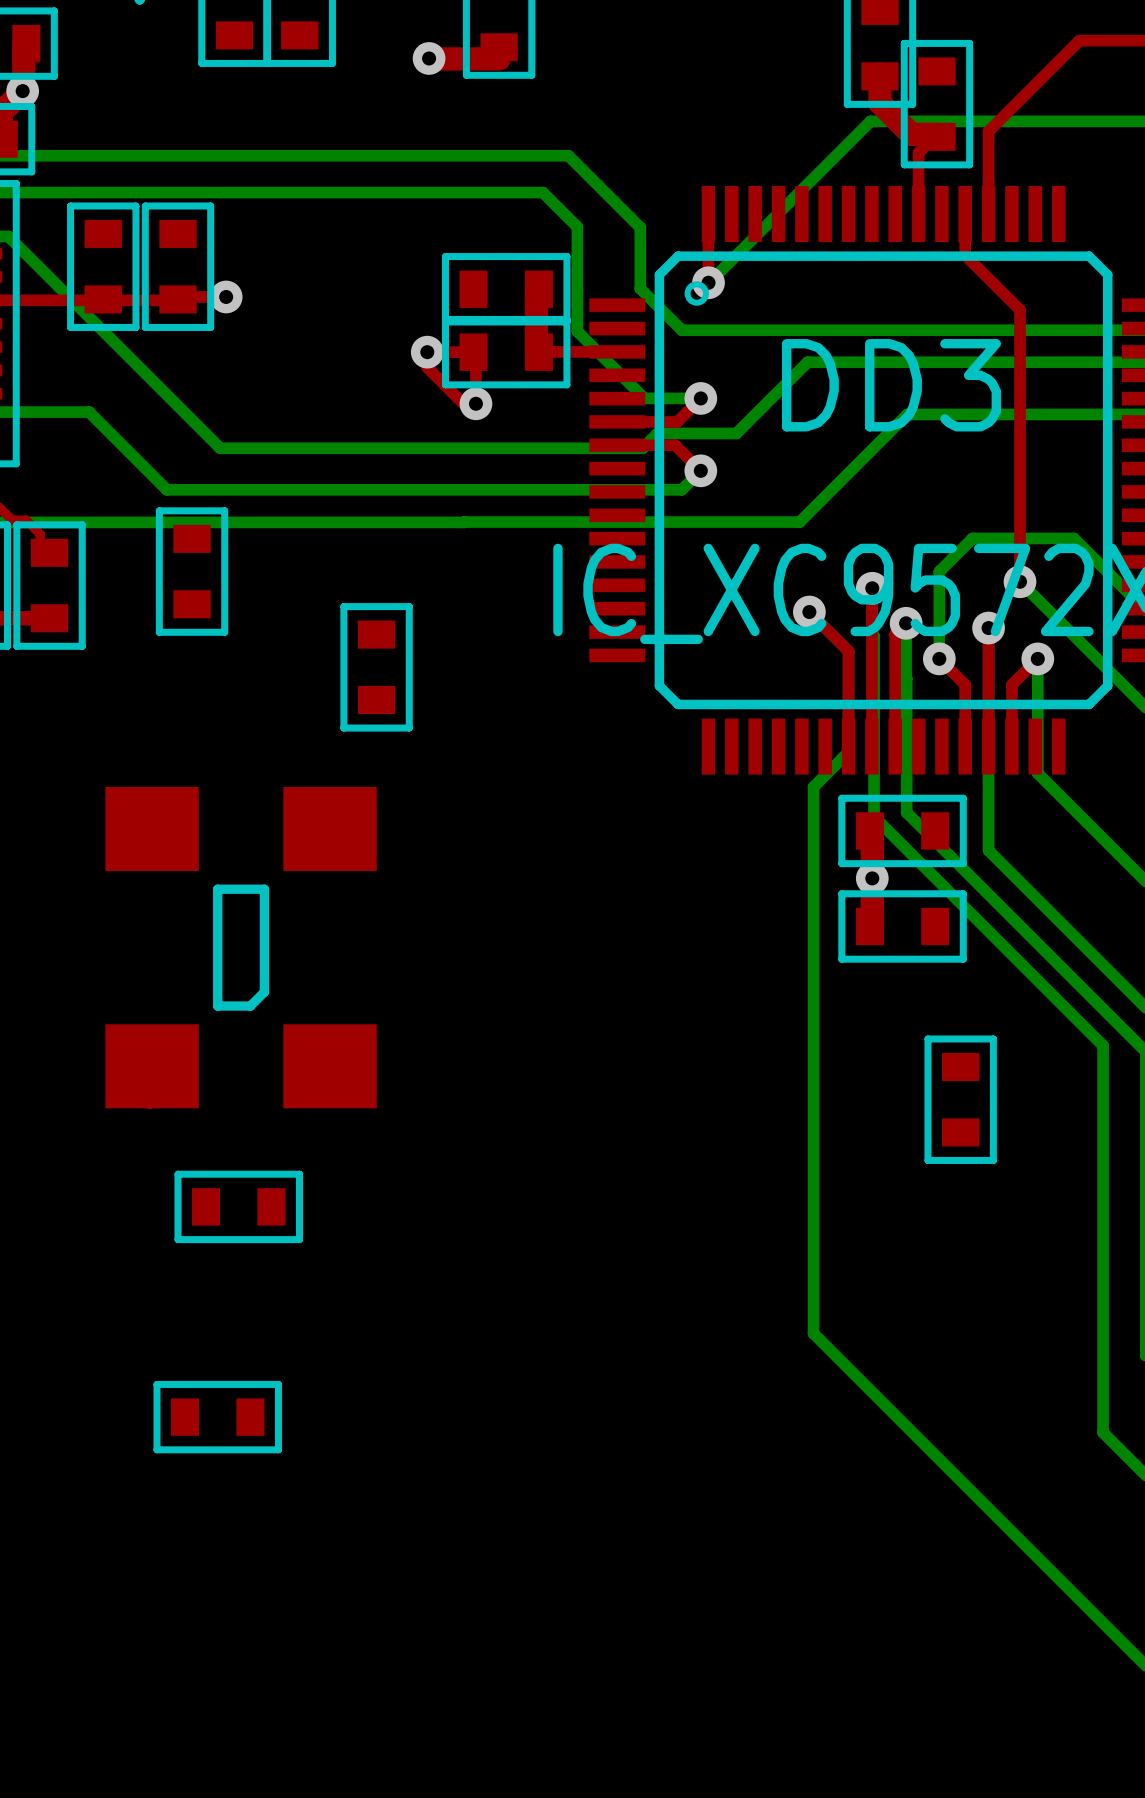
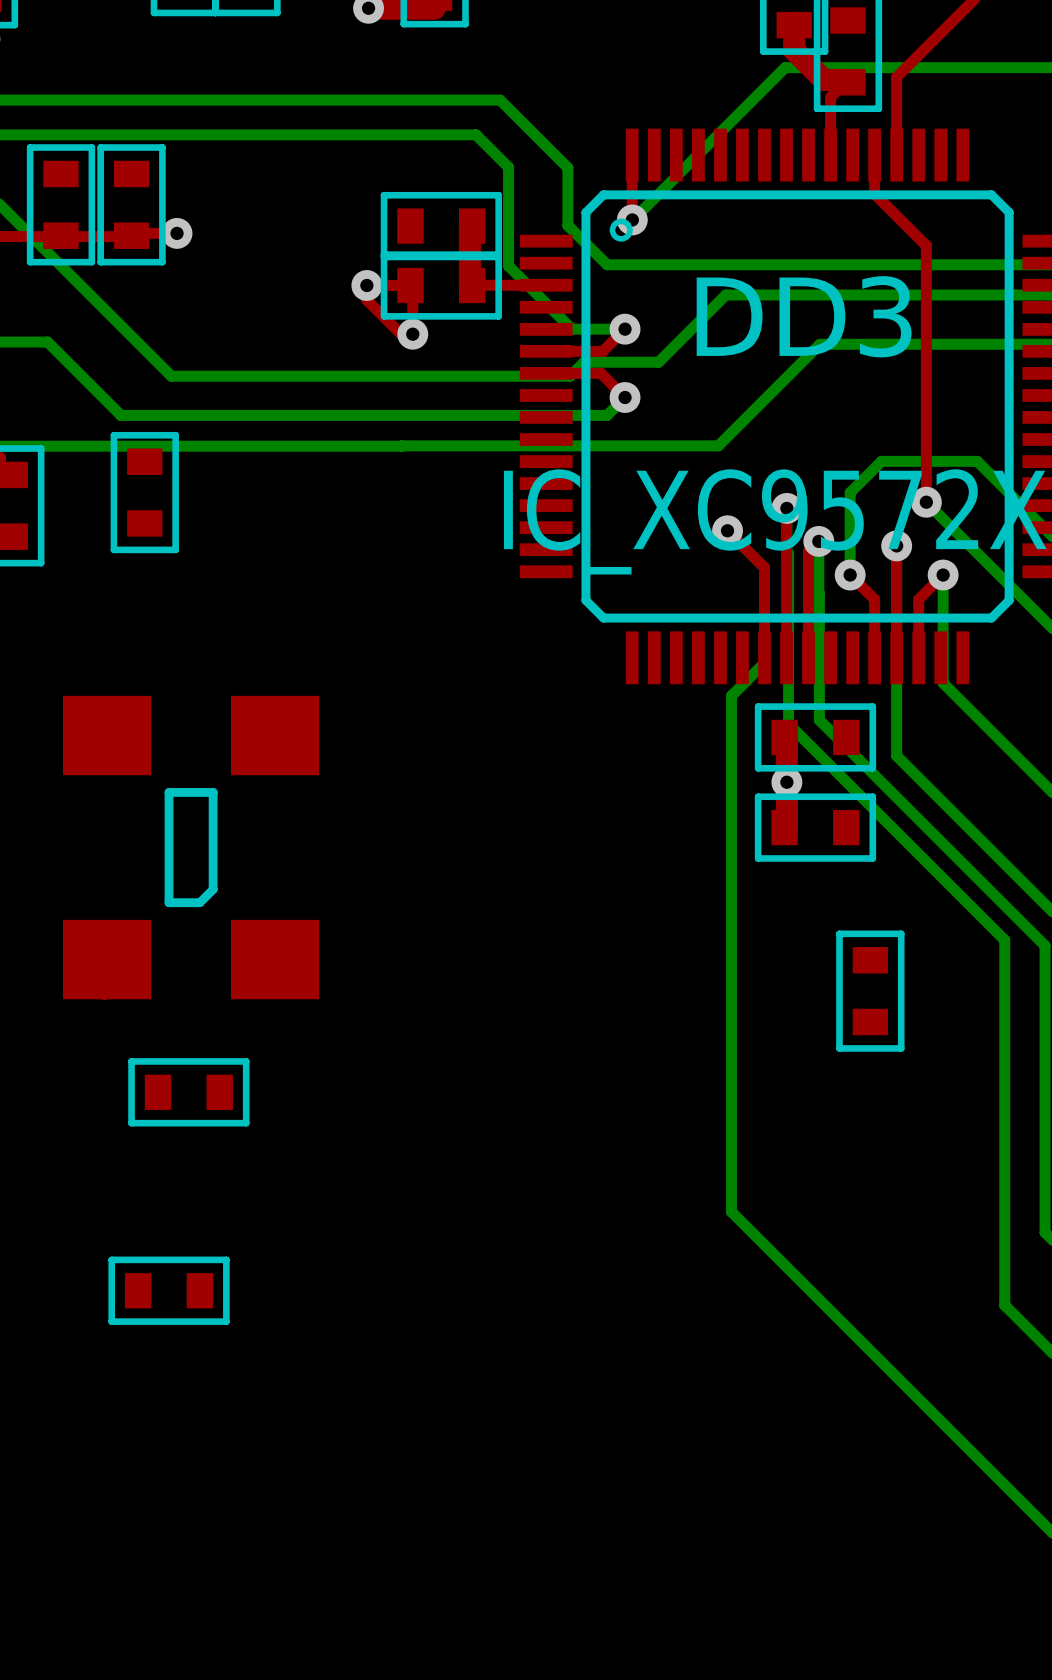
part: (376, 667) -> none

